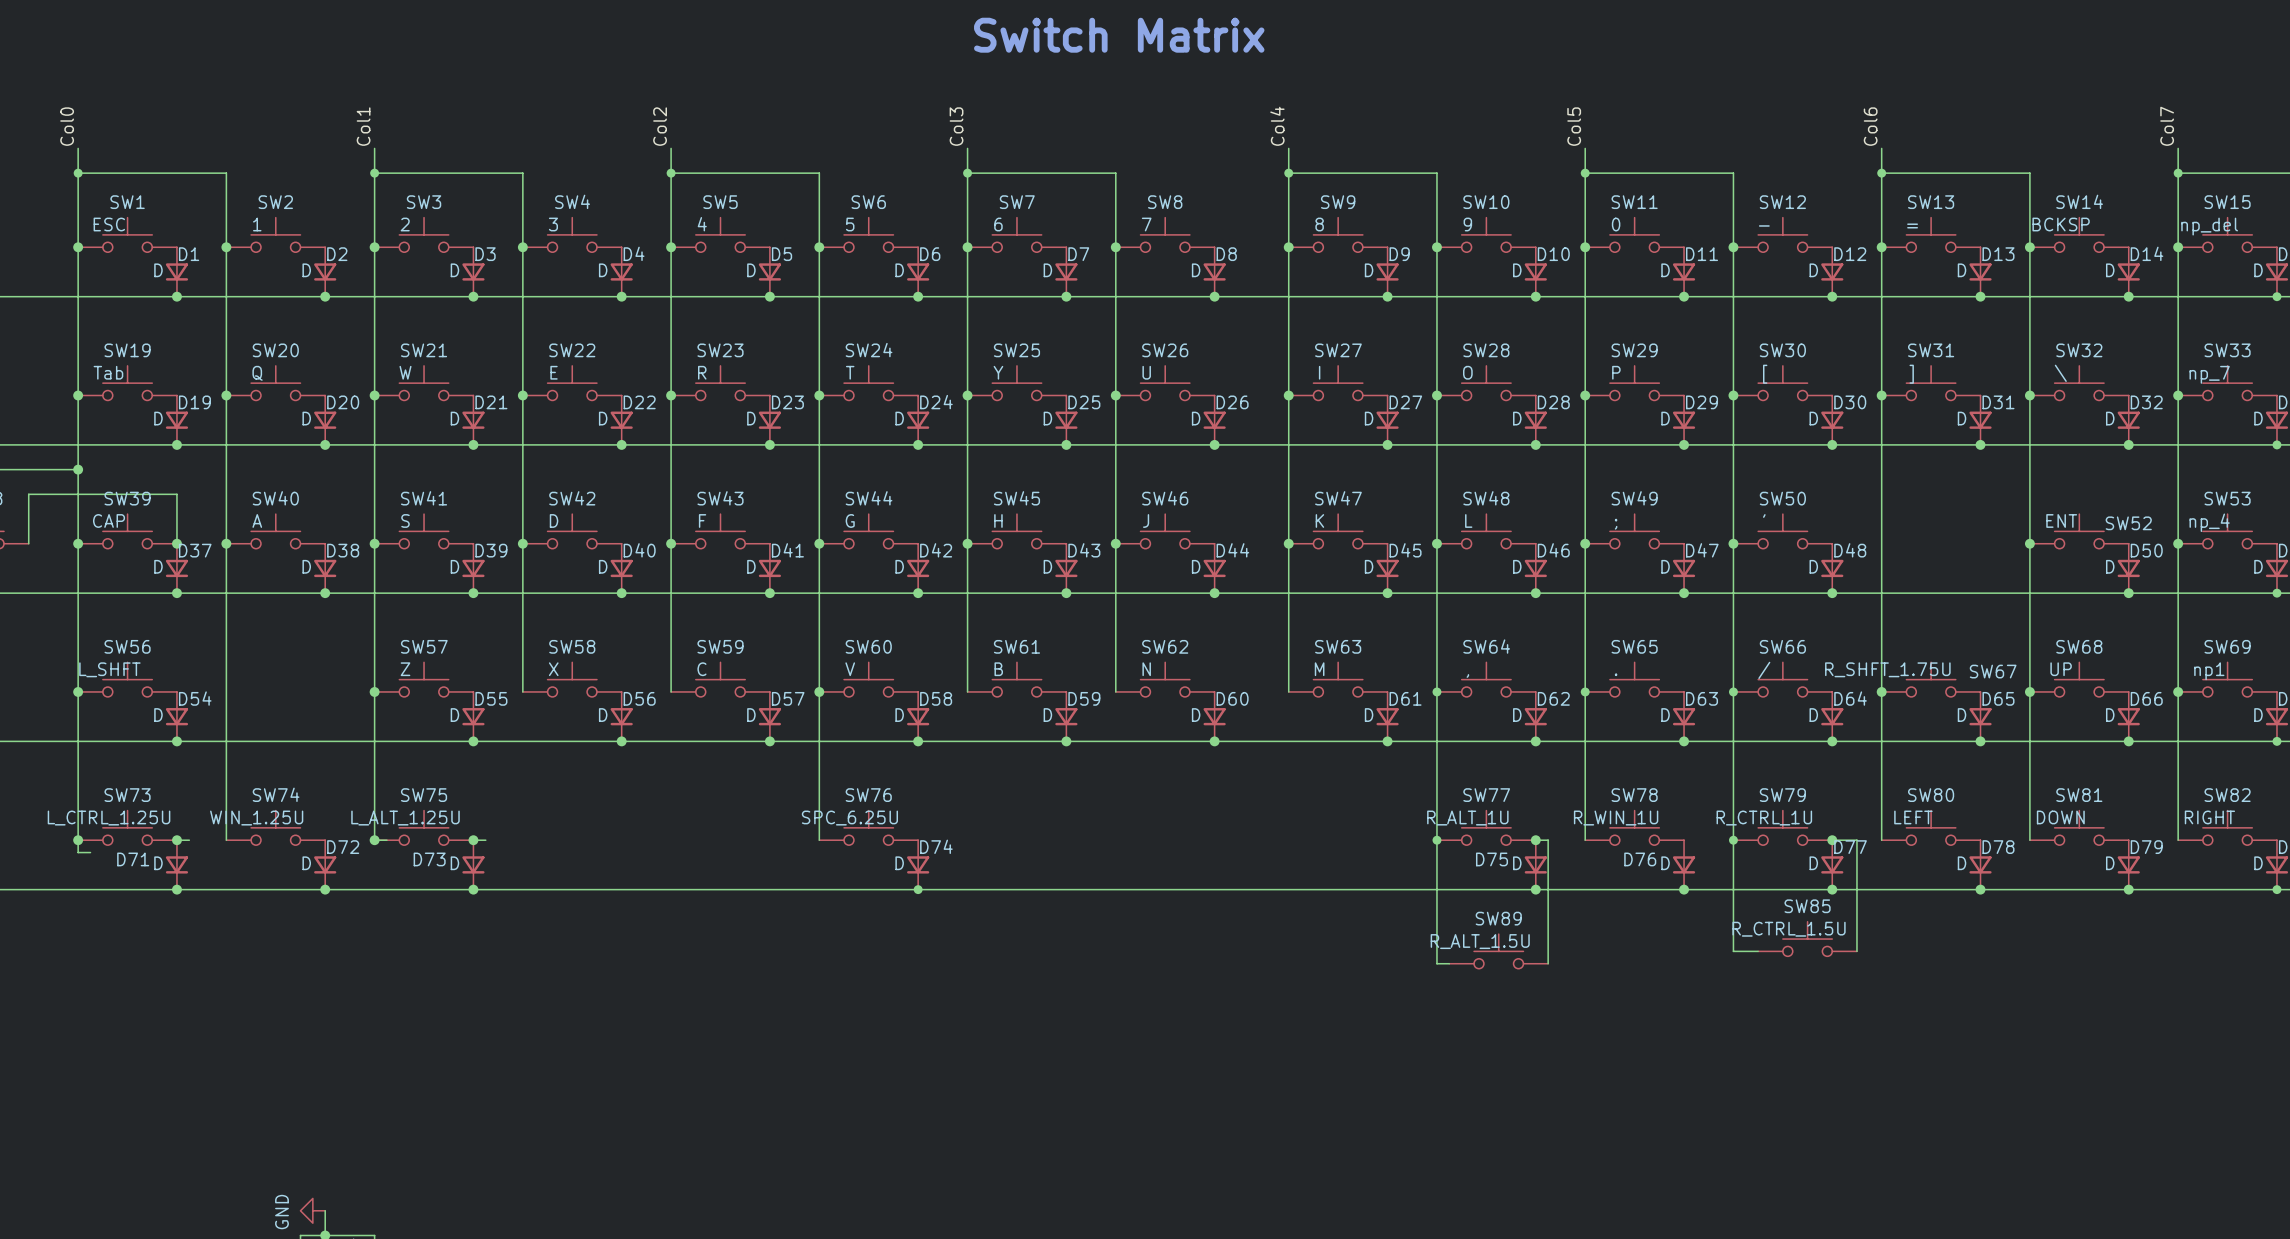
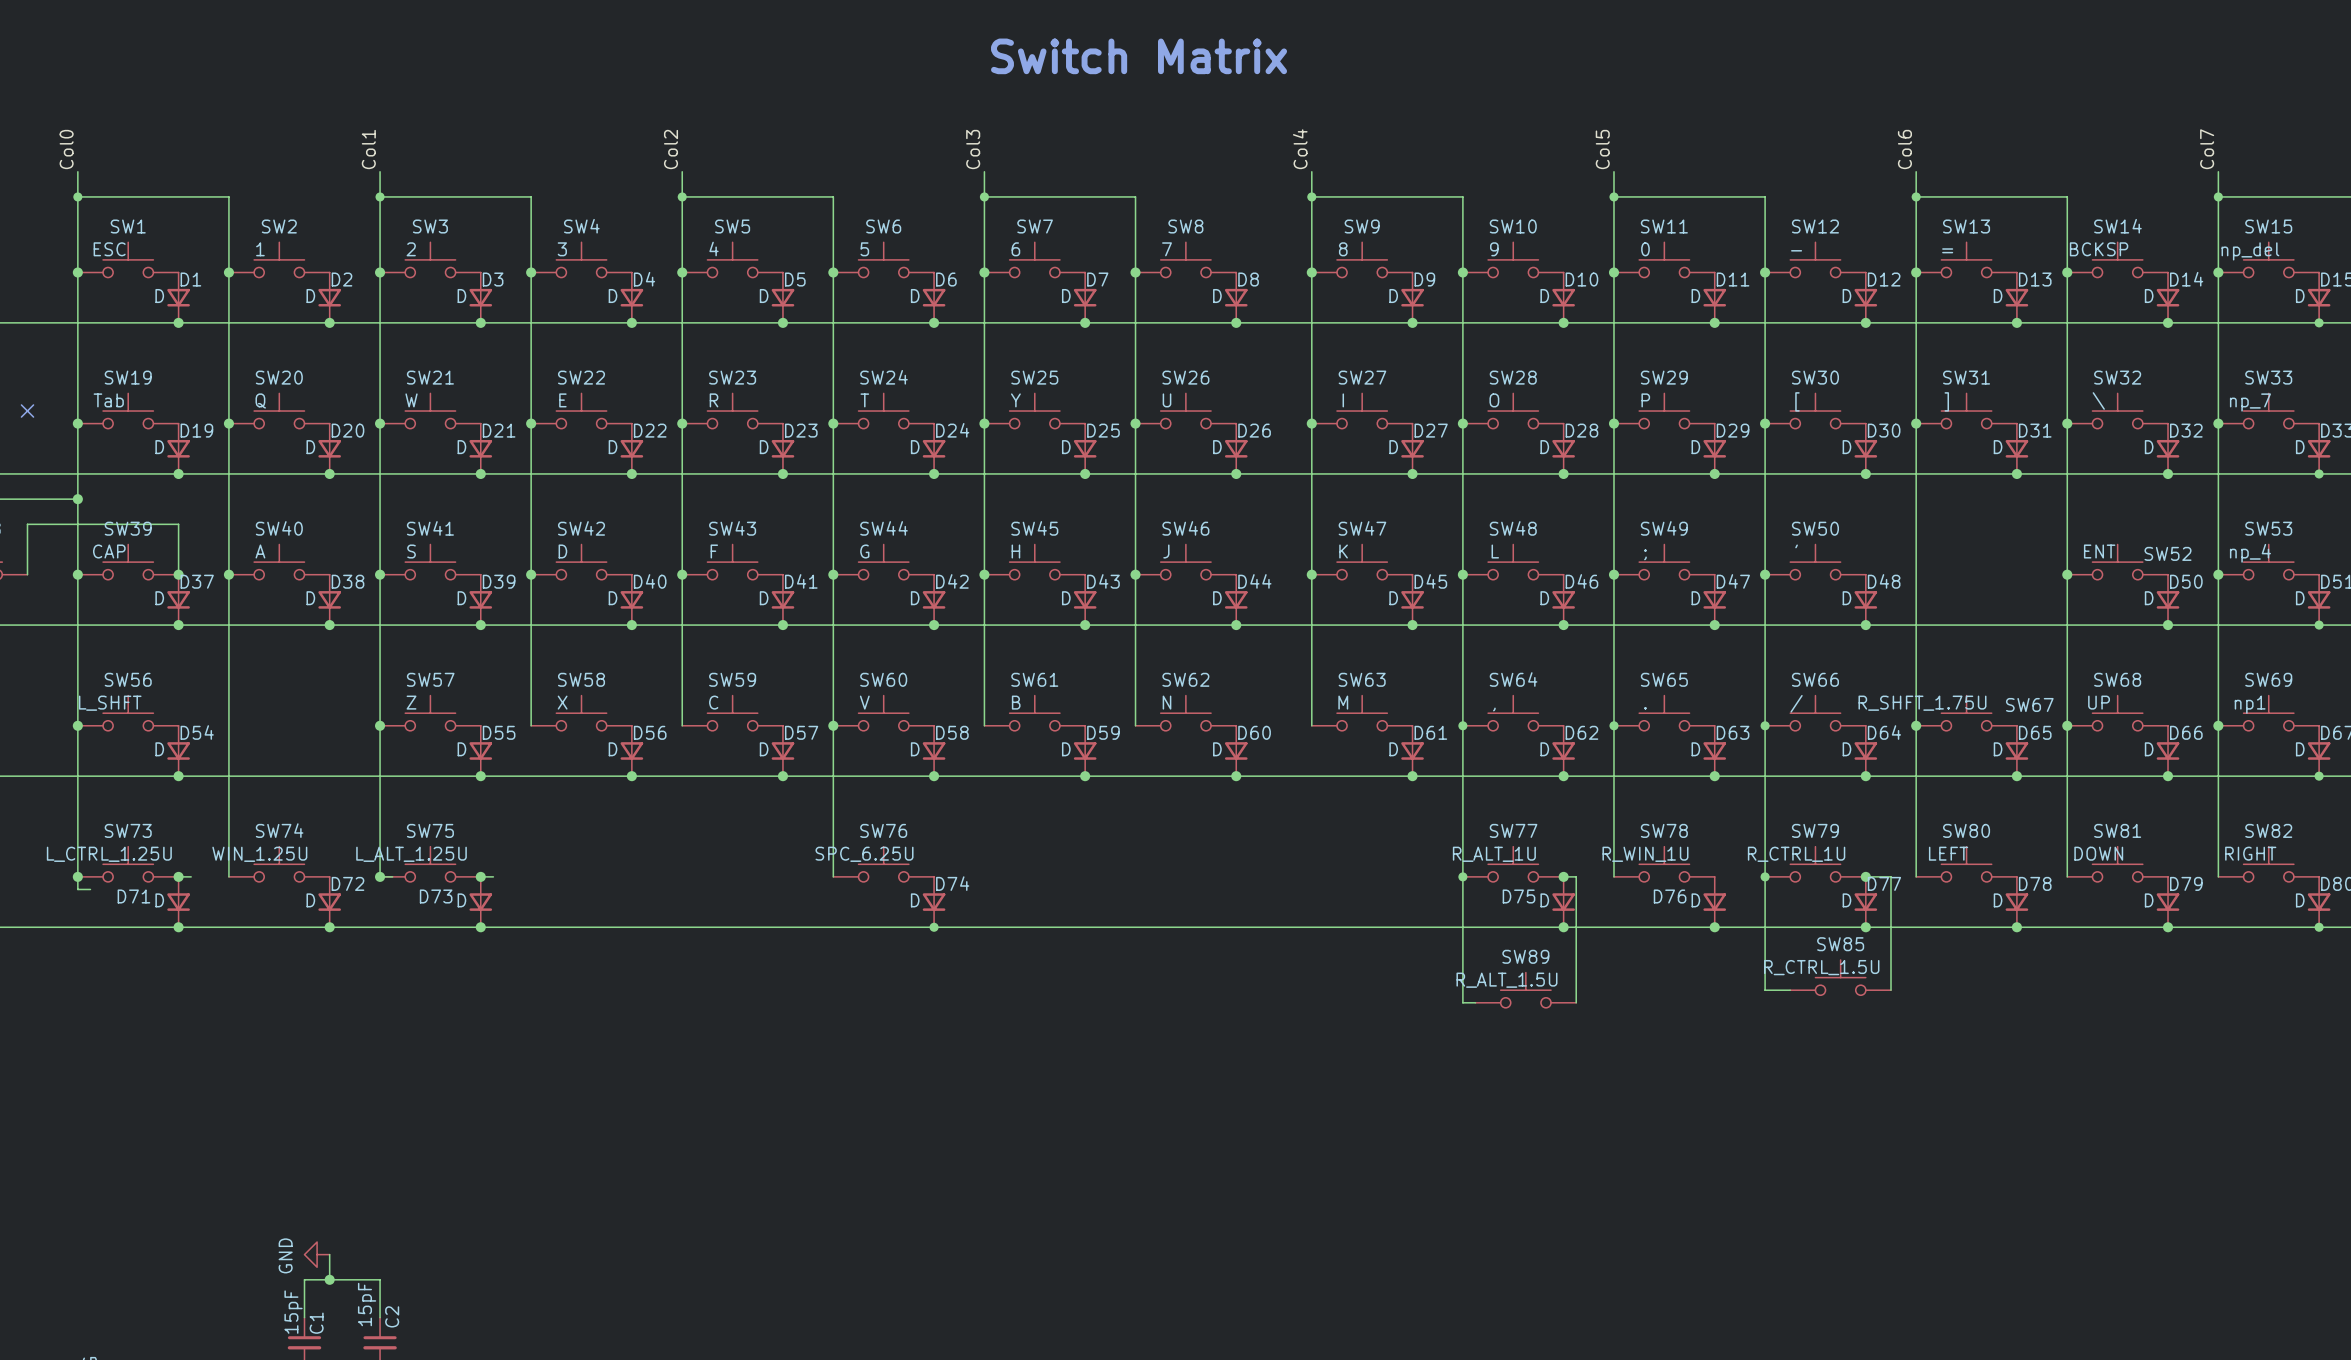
no-connect mark: none -> (27, 411)

